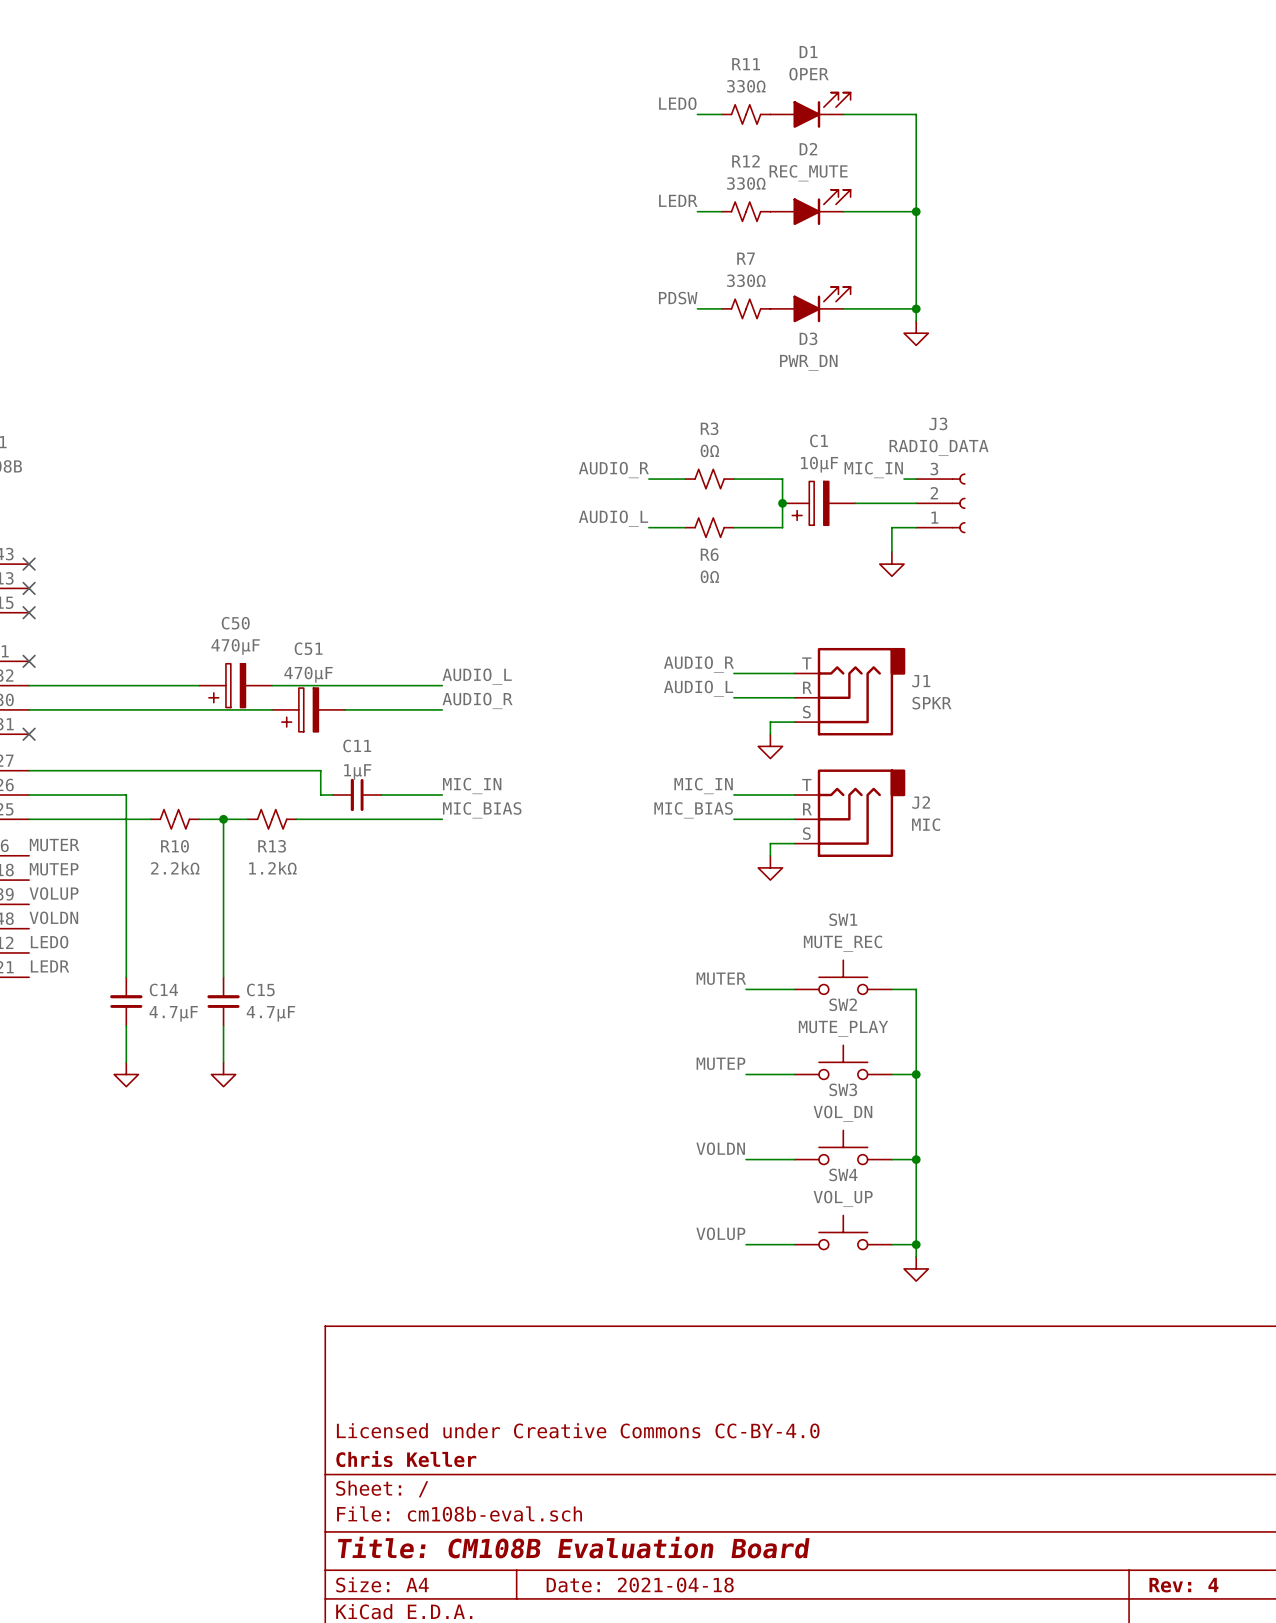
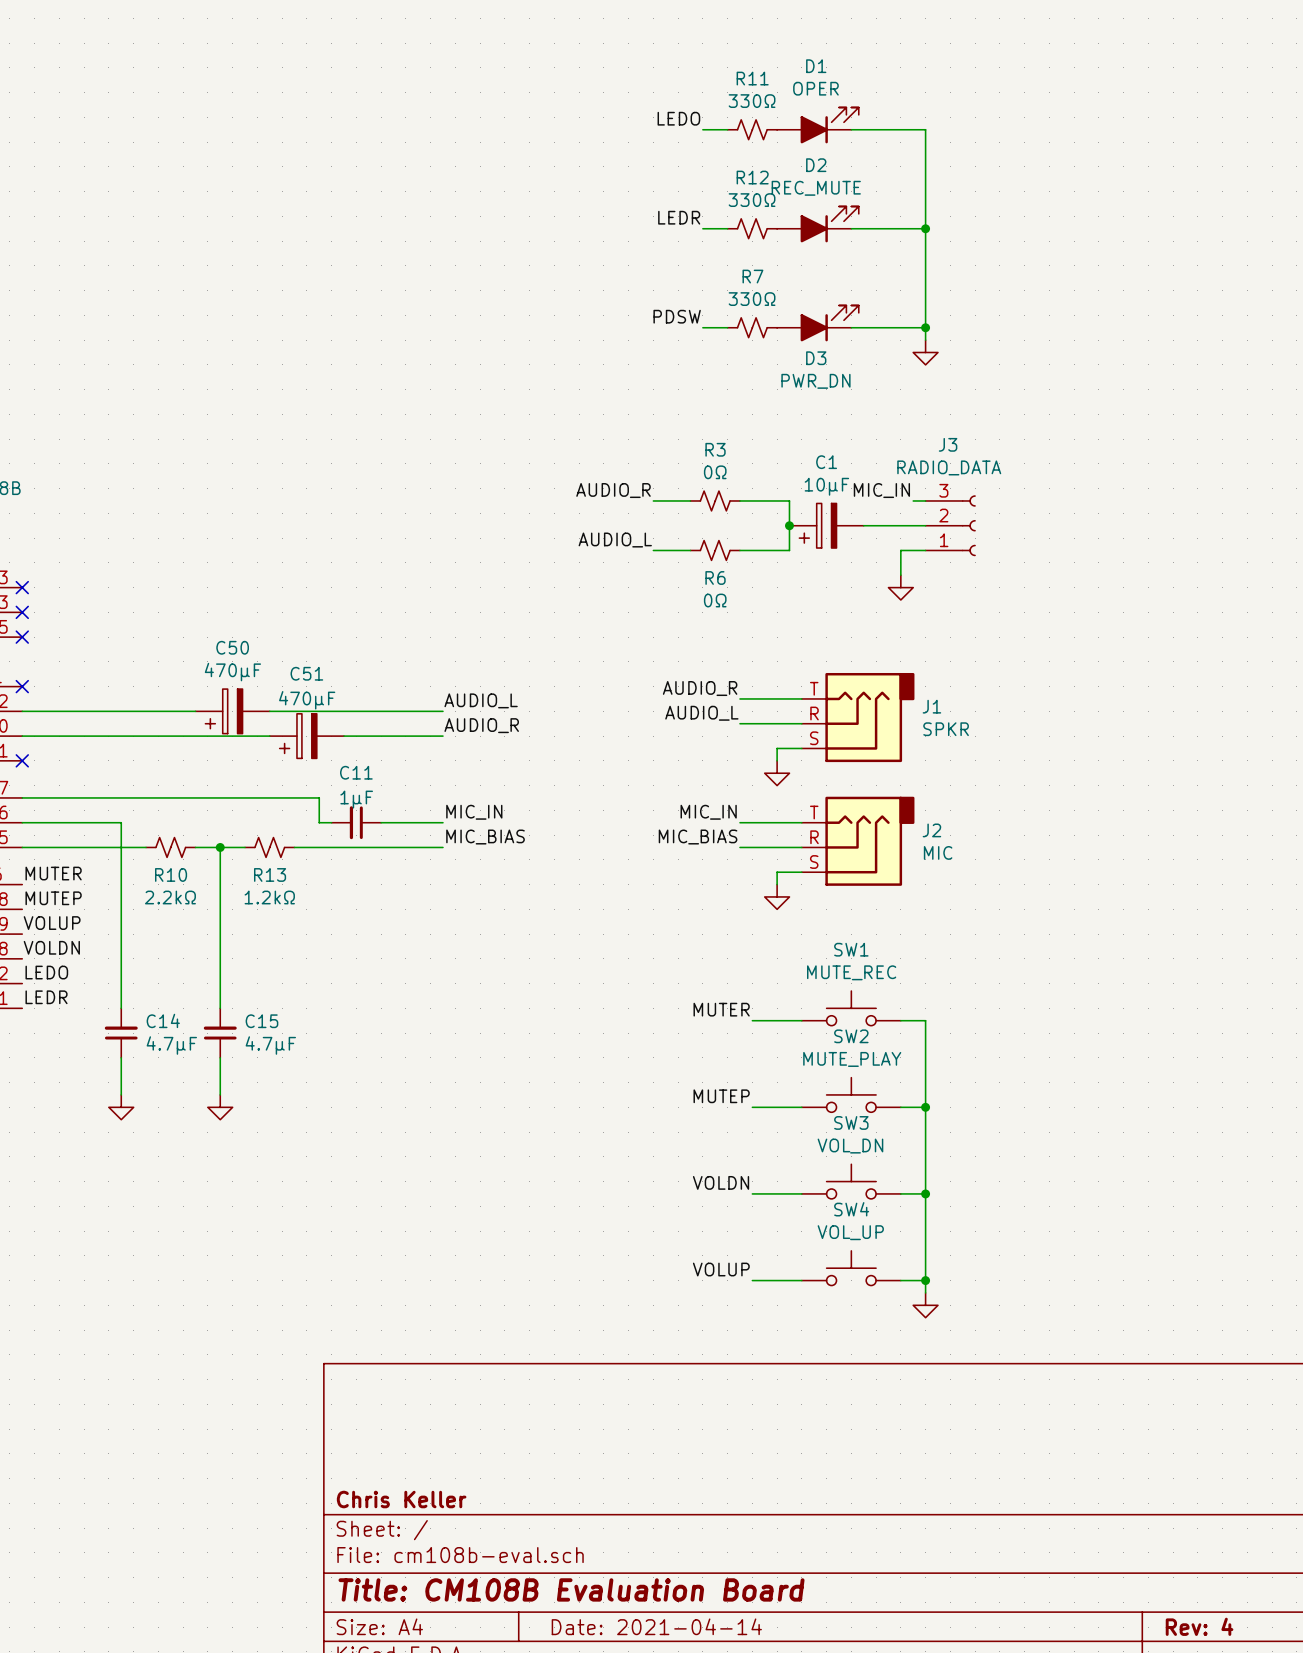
title block: Licensed under Creative Commons CC-BY-4.0 (578, 1430) -> none
title block: Date: 2021-04-18 (640, 1585) -> Date: 2021-04-14 (656, 1626)

